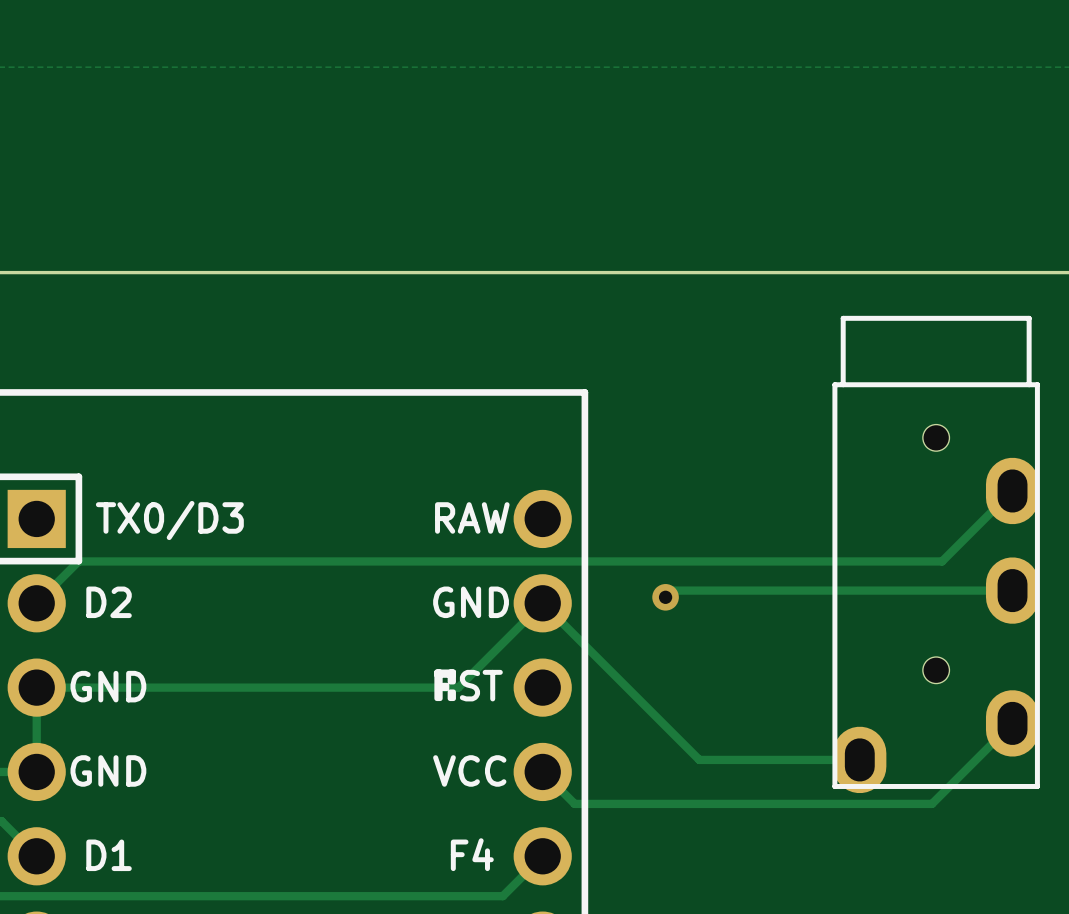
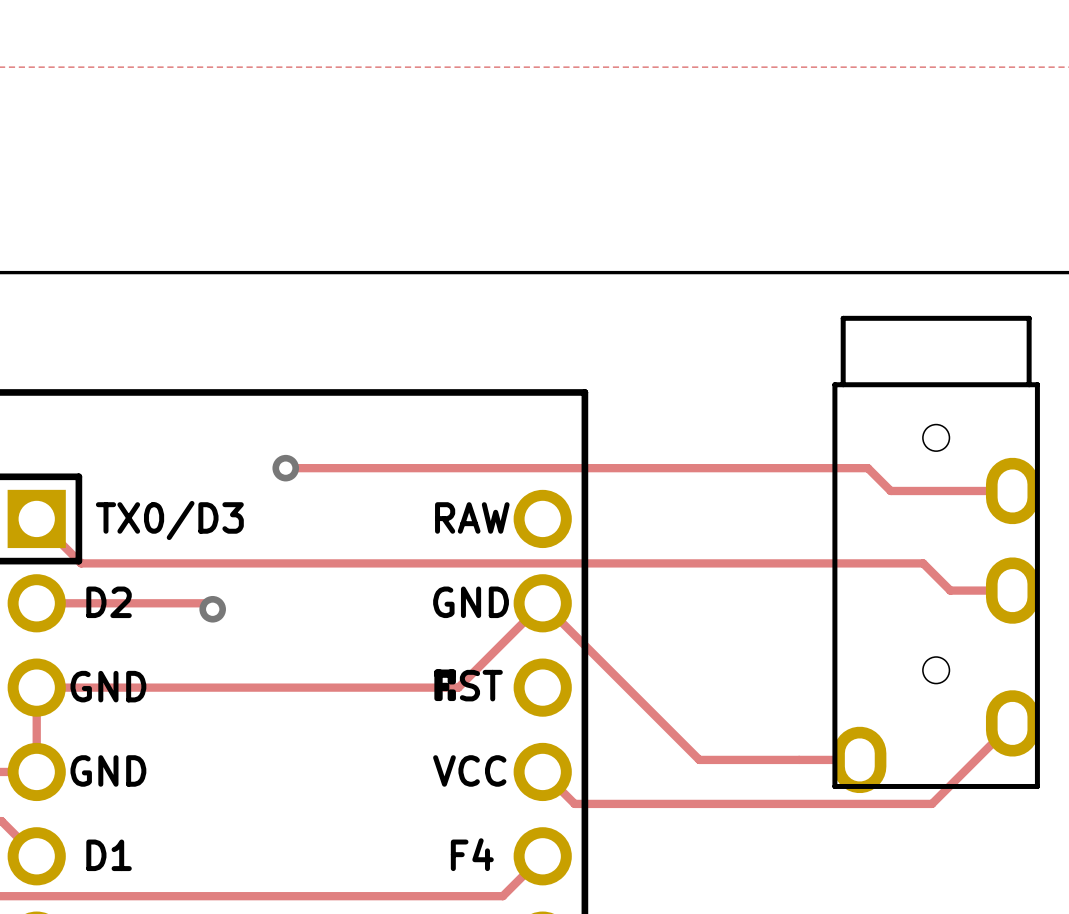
via: none -> (285, 468)
track: (1012, 490) (942, 561) (78, 561) (36, 603) -> (1012, 490) (890, 490) (867, 468) (285, 468)
track: (950, 590) (672, 590) (665, 597) -> (950, 590) (923, 563) (81, 563) (36, 518)
via: (665, 597) -> none
track: none -> (36, 603) (206, 603) (212, 609)
via: none -> (212, 609)

